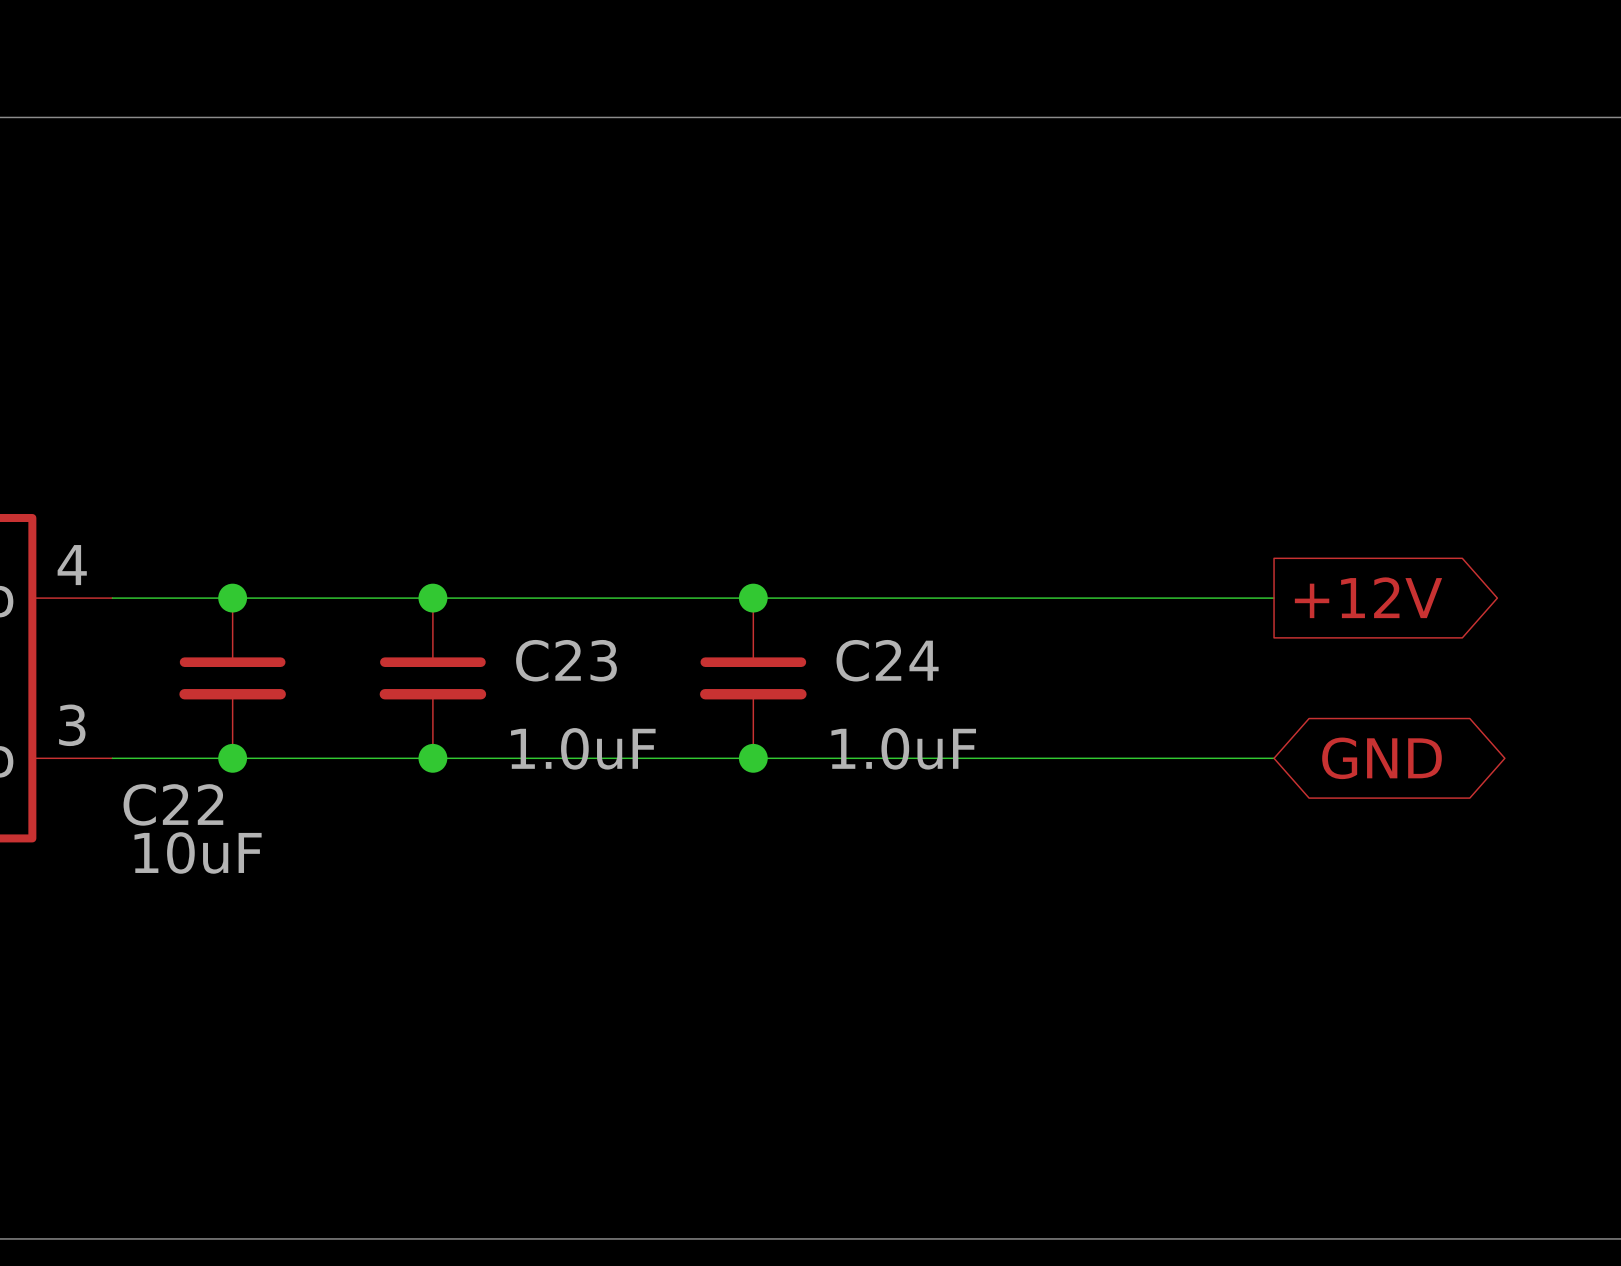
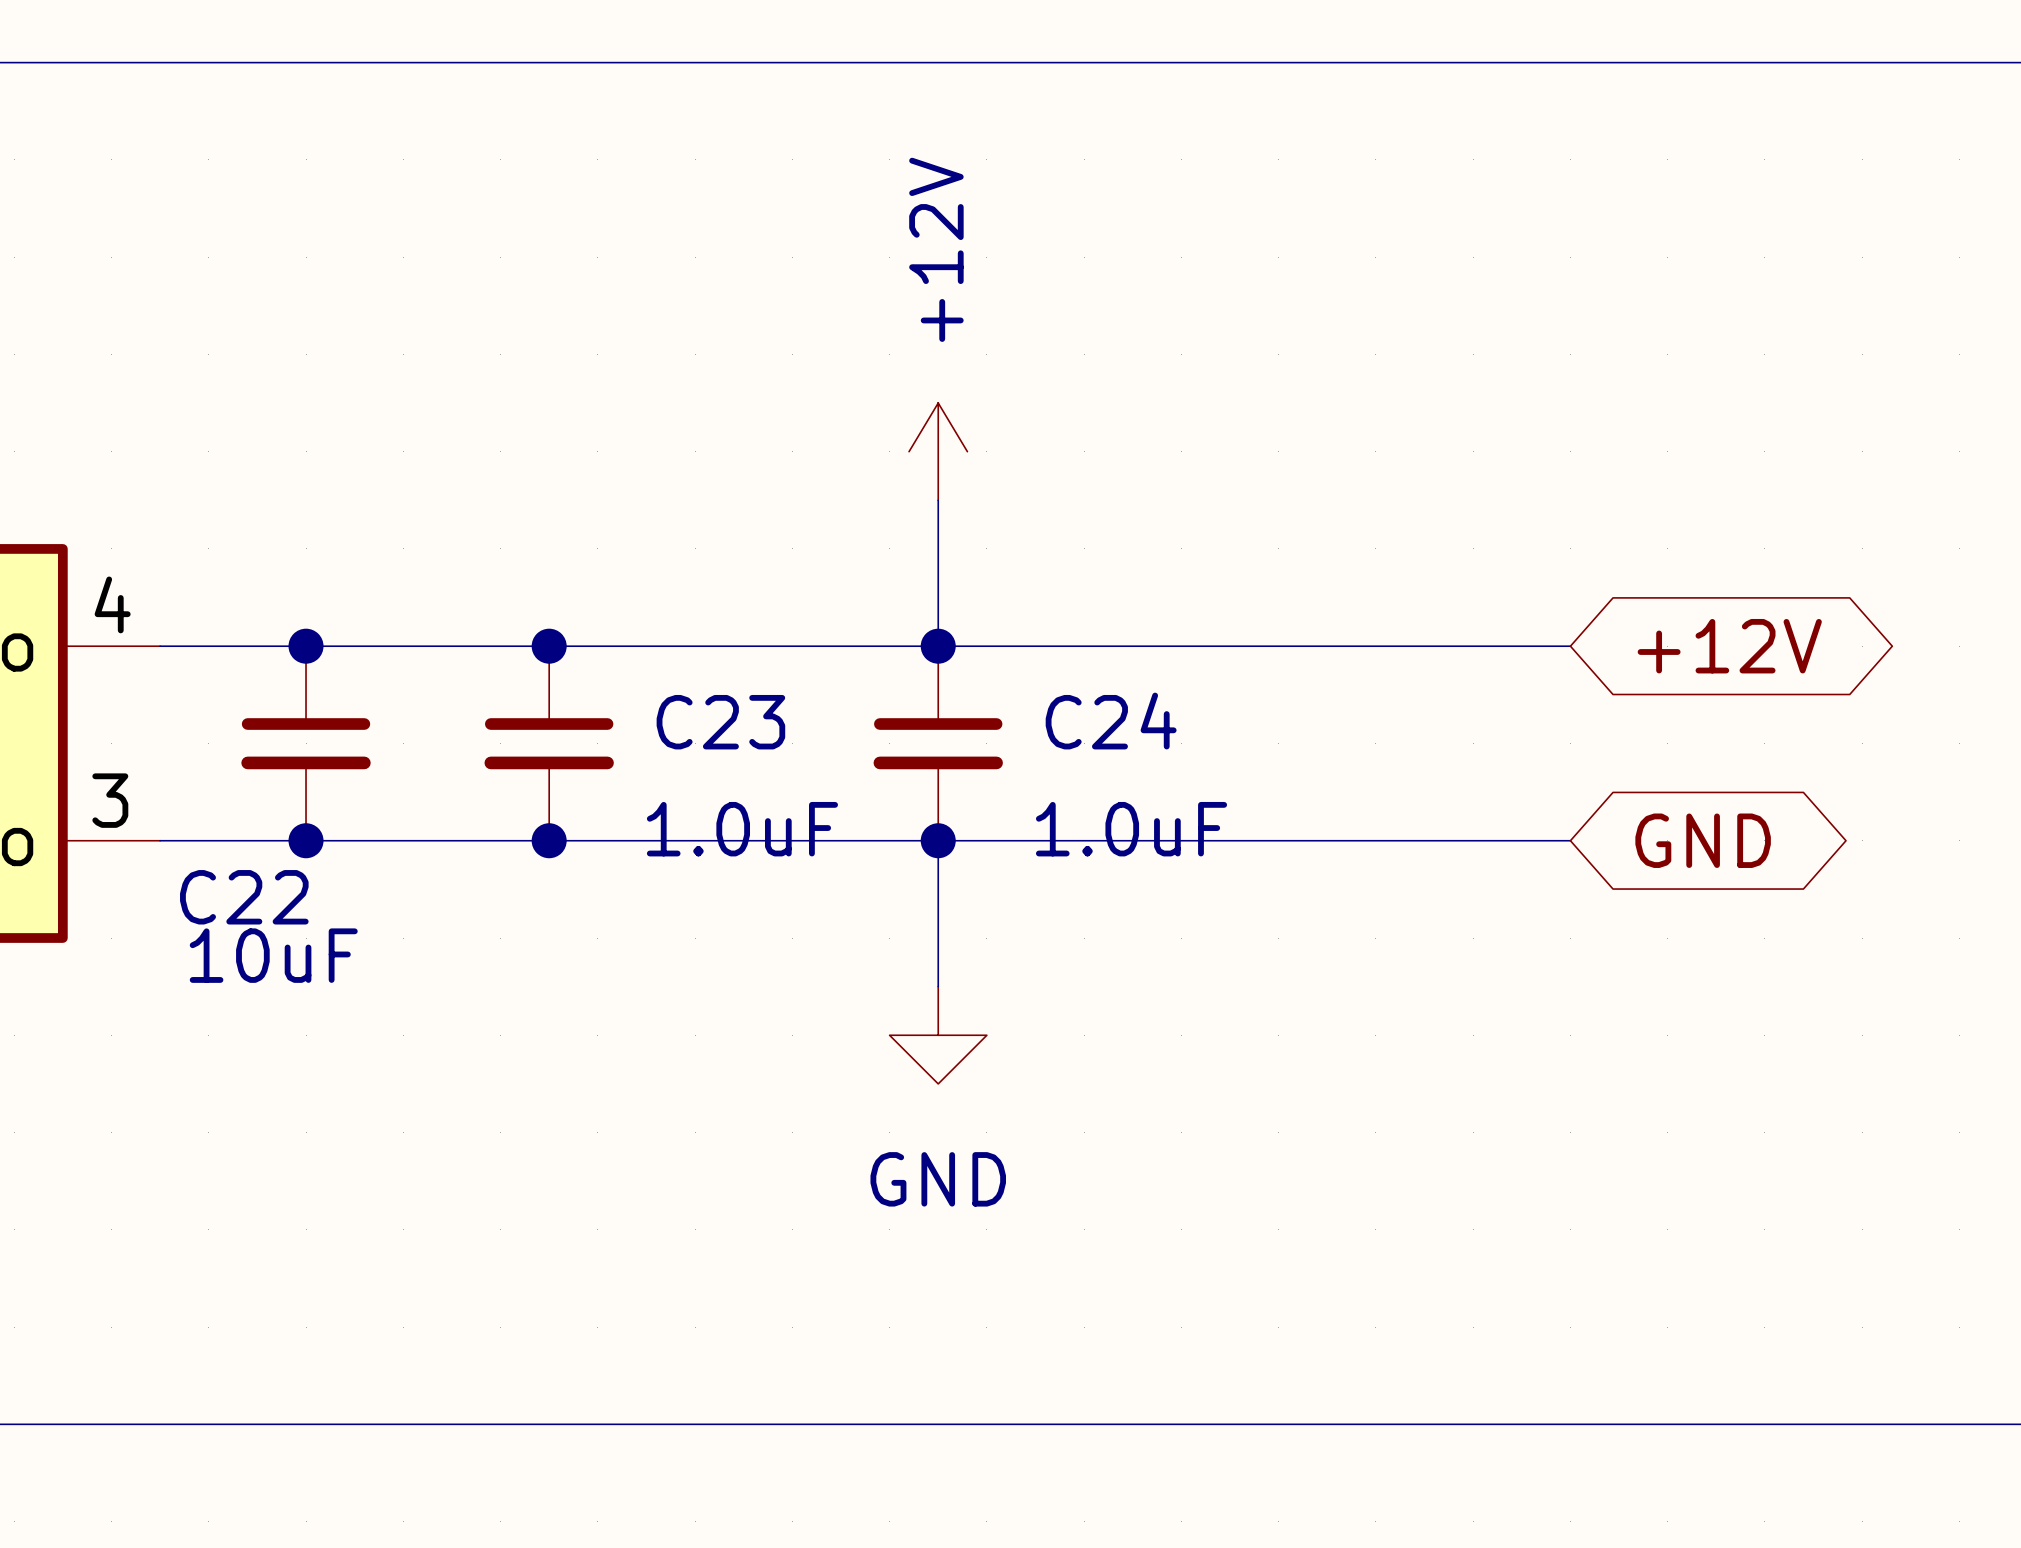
power symbol: none -> +12V (938, 451)
wire: none -> (938, 500) (938, 646)
global label shape: output (1368, 597) -> bidirectional (1729, 646)
wire: none -> (938, 840) (938, 986)
power symbol: none -> GND (938, 1035)

